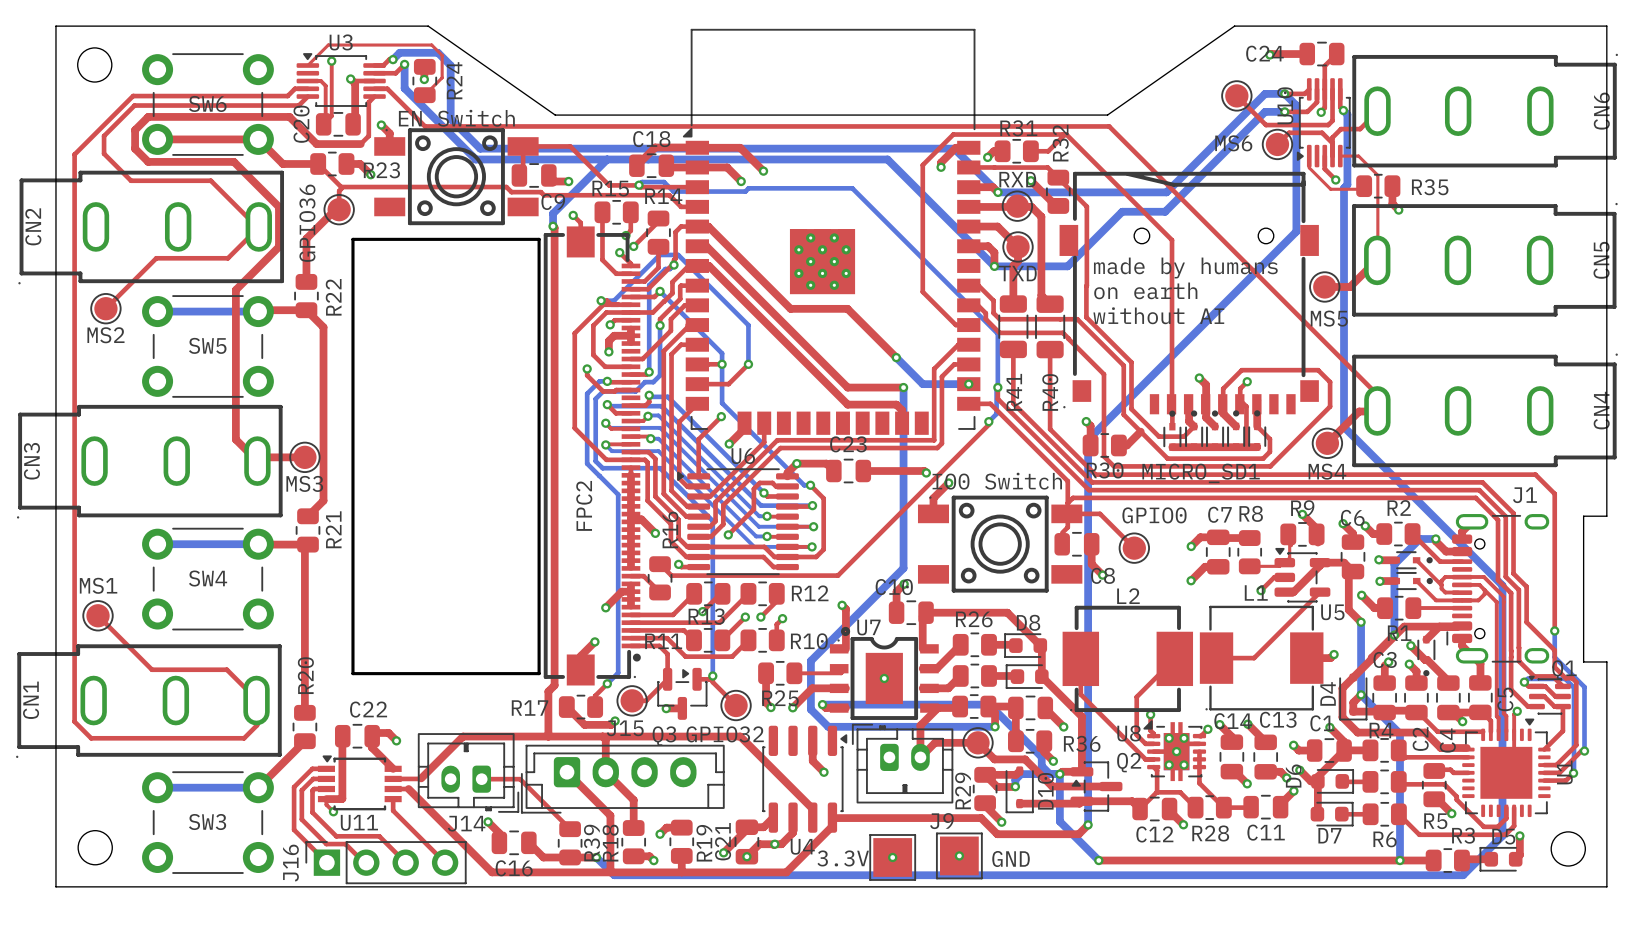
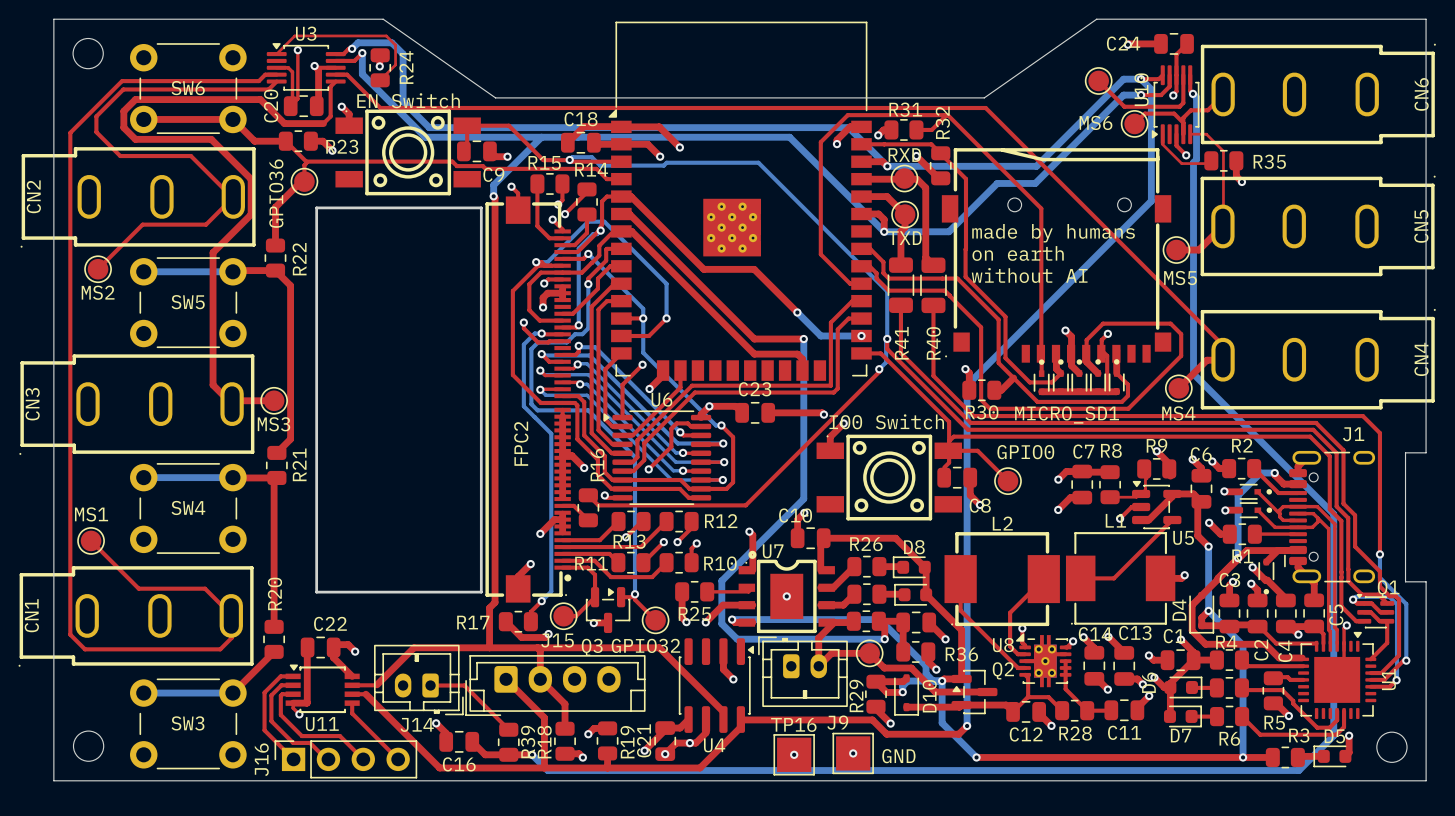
TP16 name: none -> TP16 (793, 724)
TP16 value: 3.3V (843, 858) -> none

